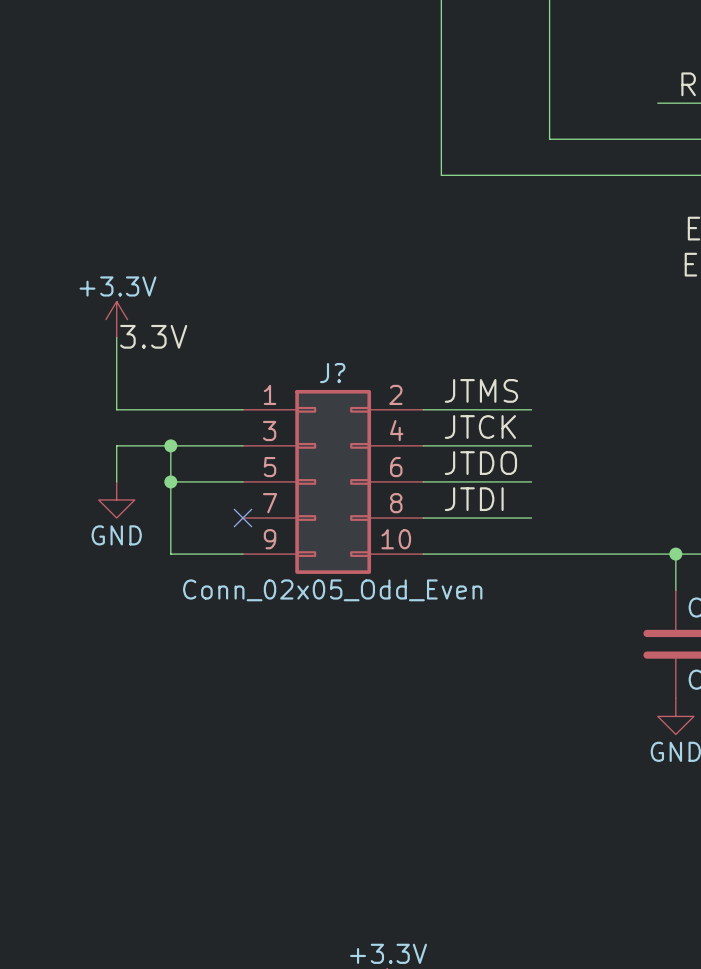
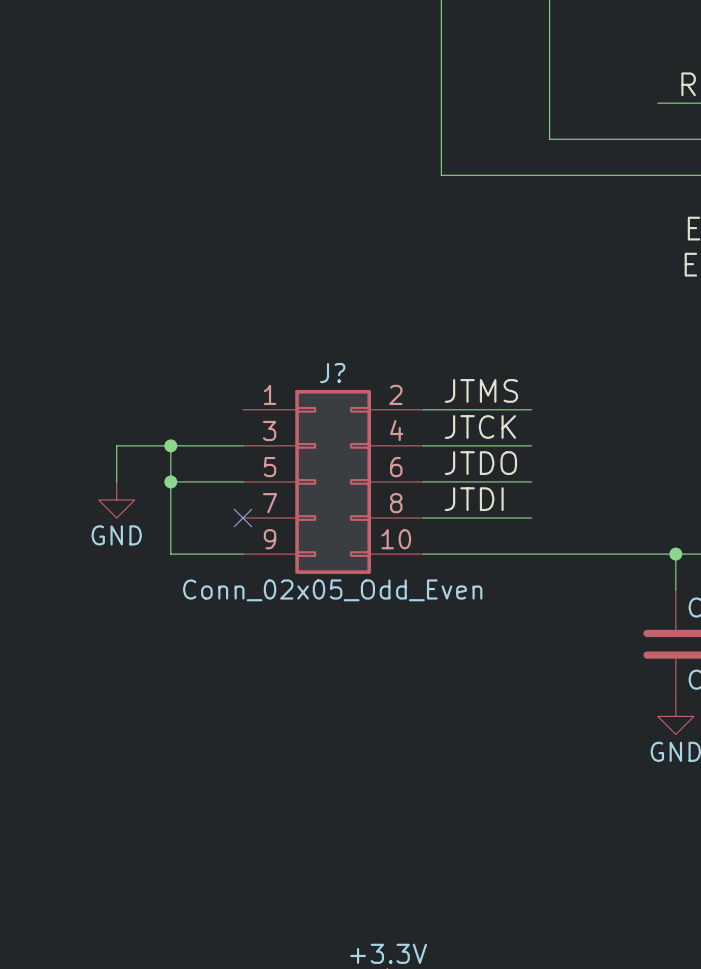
power symbol: +3.3V (116, 319) -> none
label: 3.3V (153, 336) -> none
wire: (116, 337) (116, 409) (242, 409) -> none

